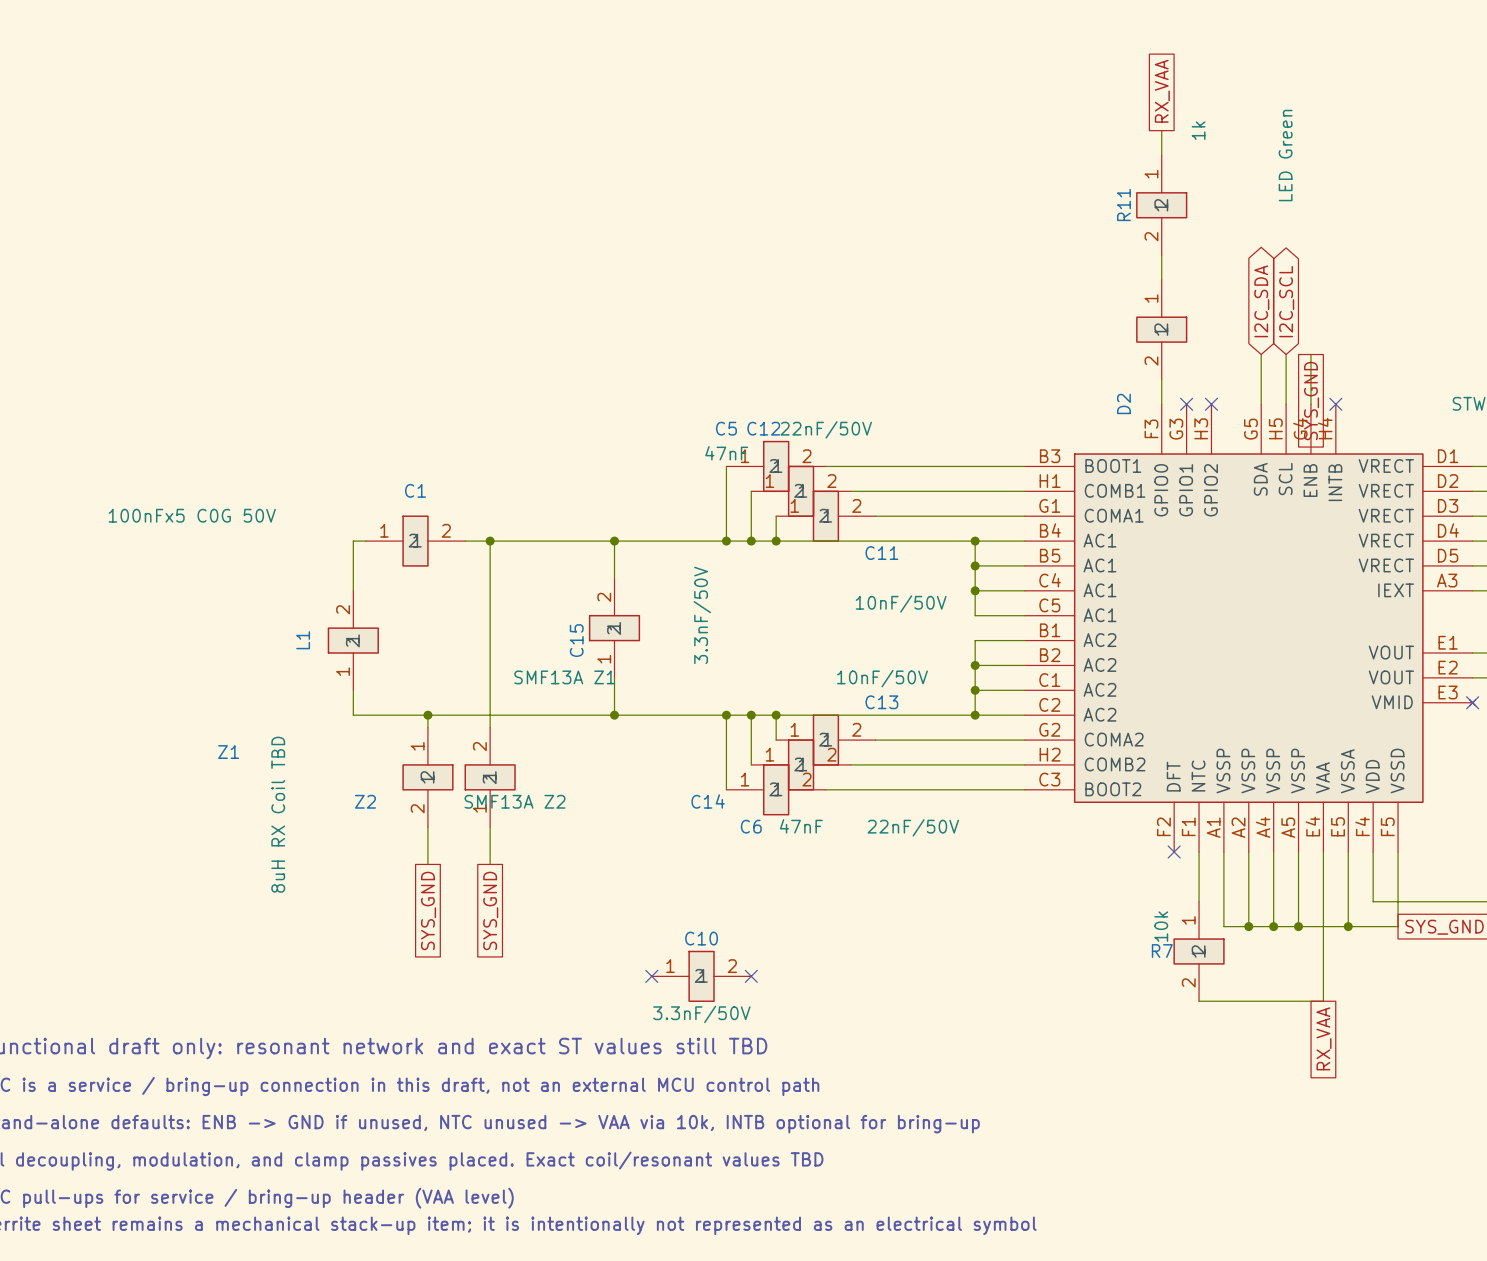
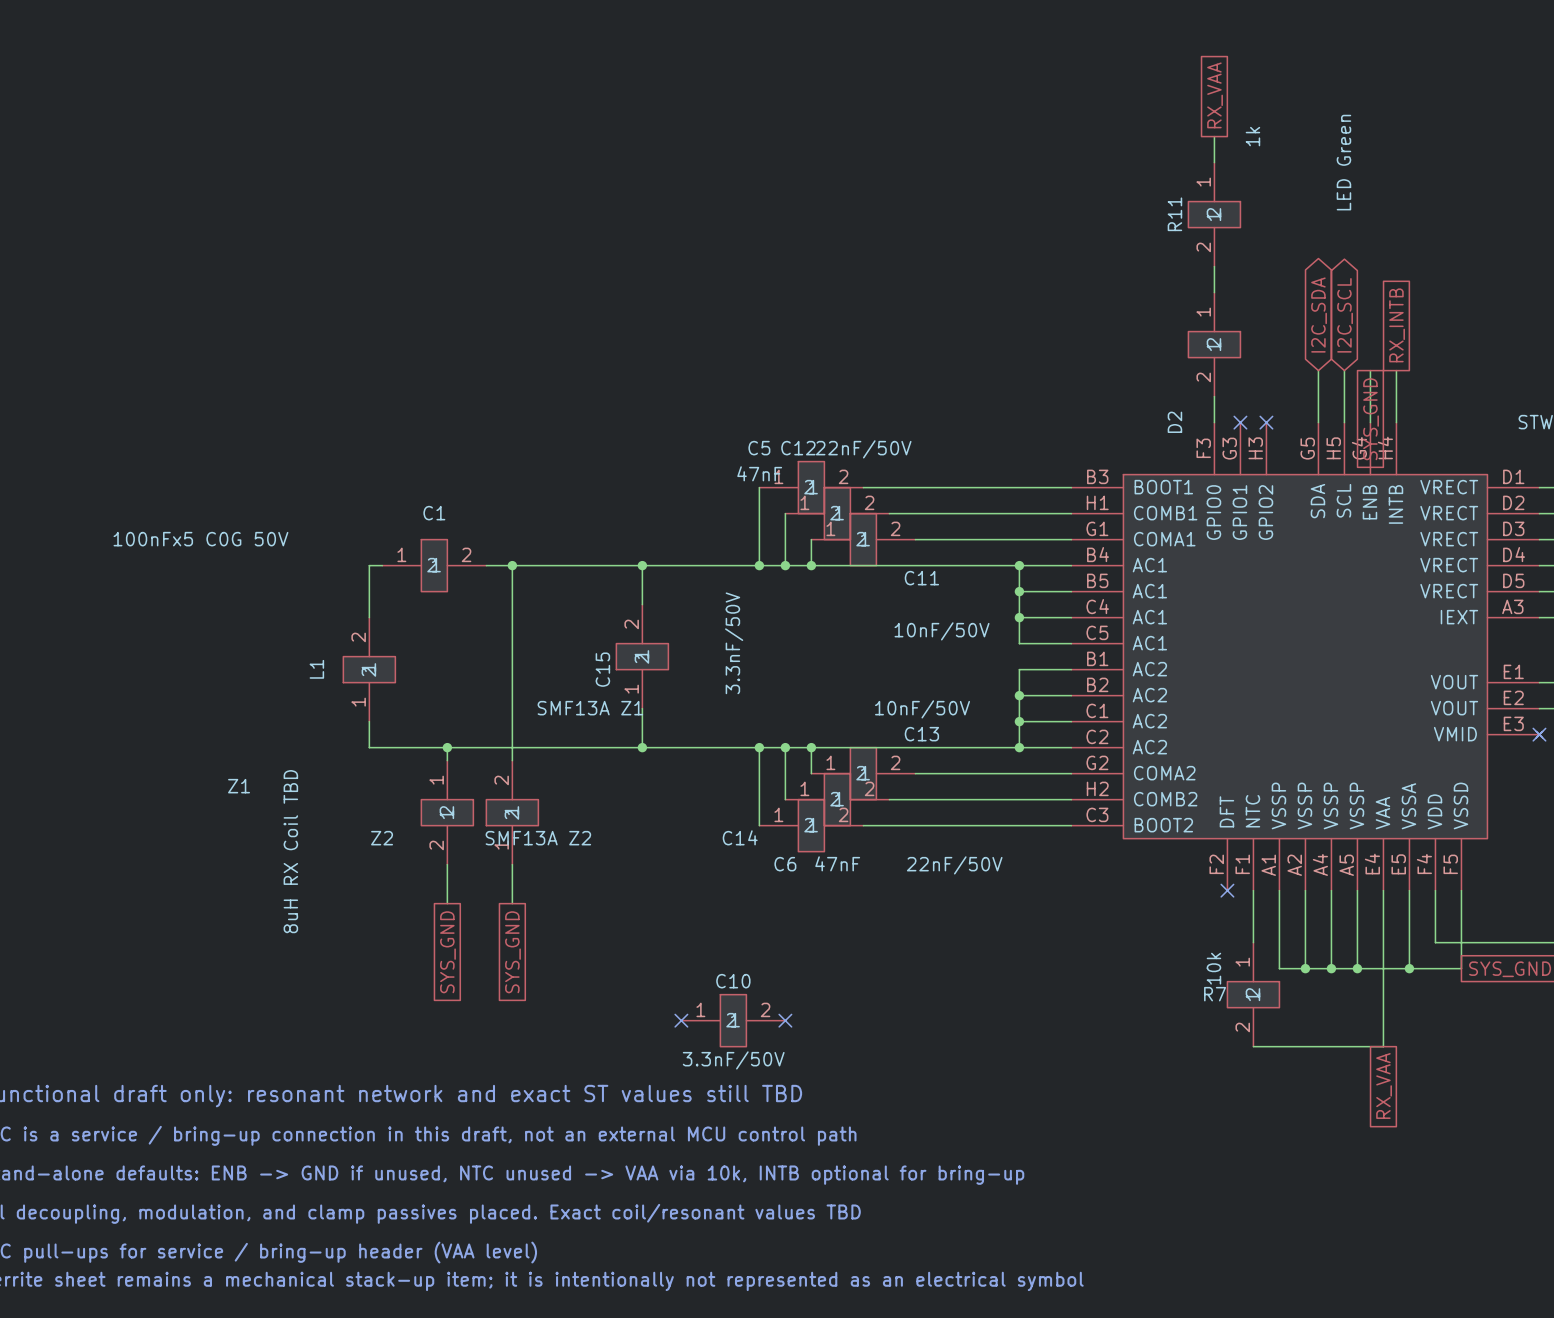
global label: none -> RX_INTB (1397, 325)
wire: none -> (1396, 370) (1396, 422)
no-connect mark: (1335, 404) -> none

